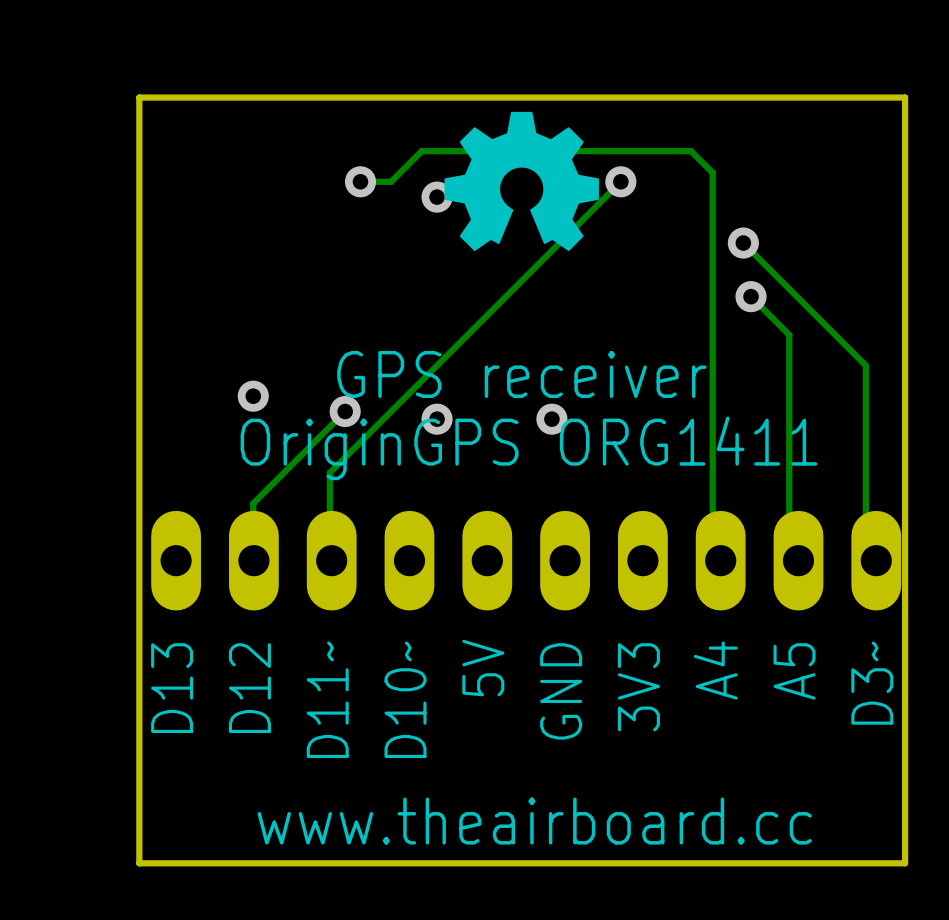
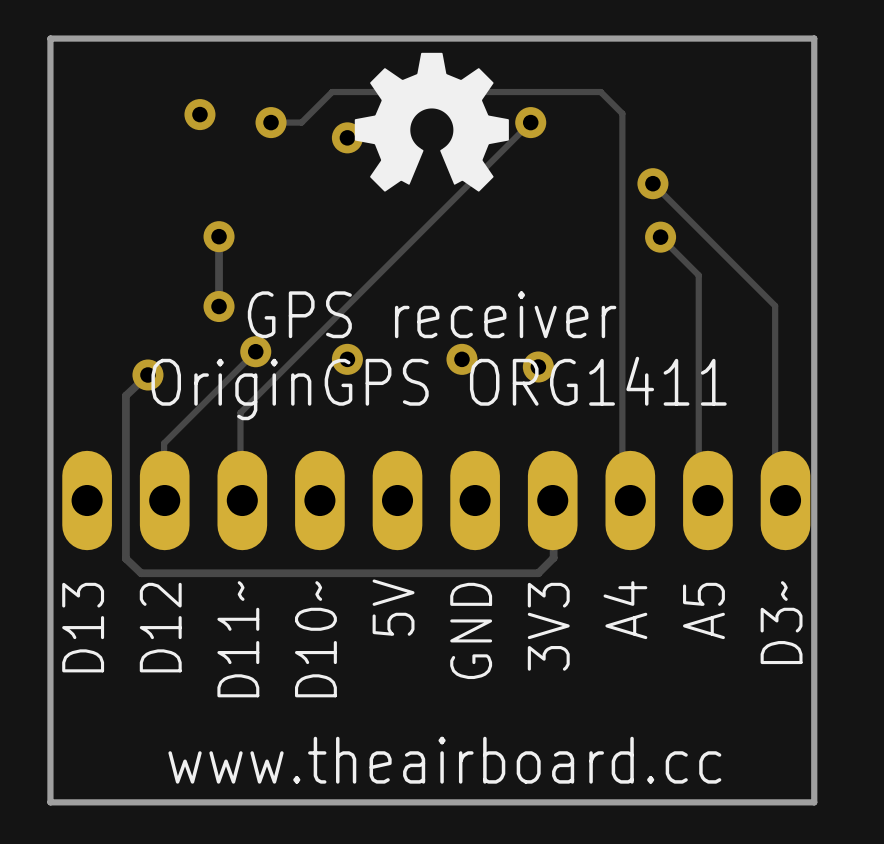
via: none -> (199, 114)
track: none -> (219, 236) (219, 306)
via: none -> (219, 236)
via: none -> (219, 306)
via: (253, 396) -> none
via: none -> (538, 367)
track: none -> (147, 375) (125, 395) (125, 558) (141, 573) (538, 573) (553, 557) (552, 500)
via: none -> (147, 375)

